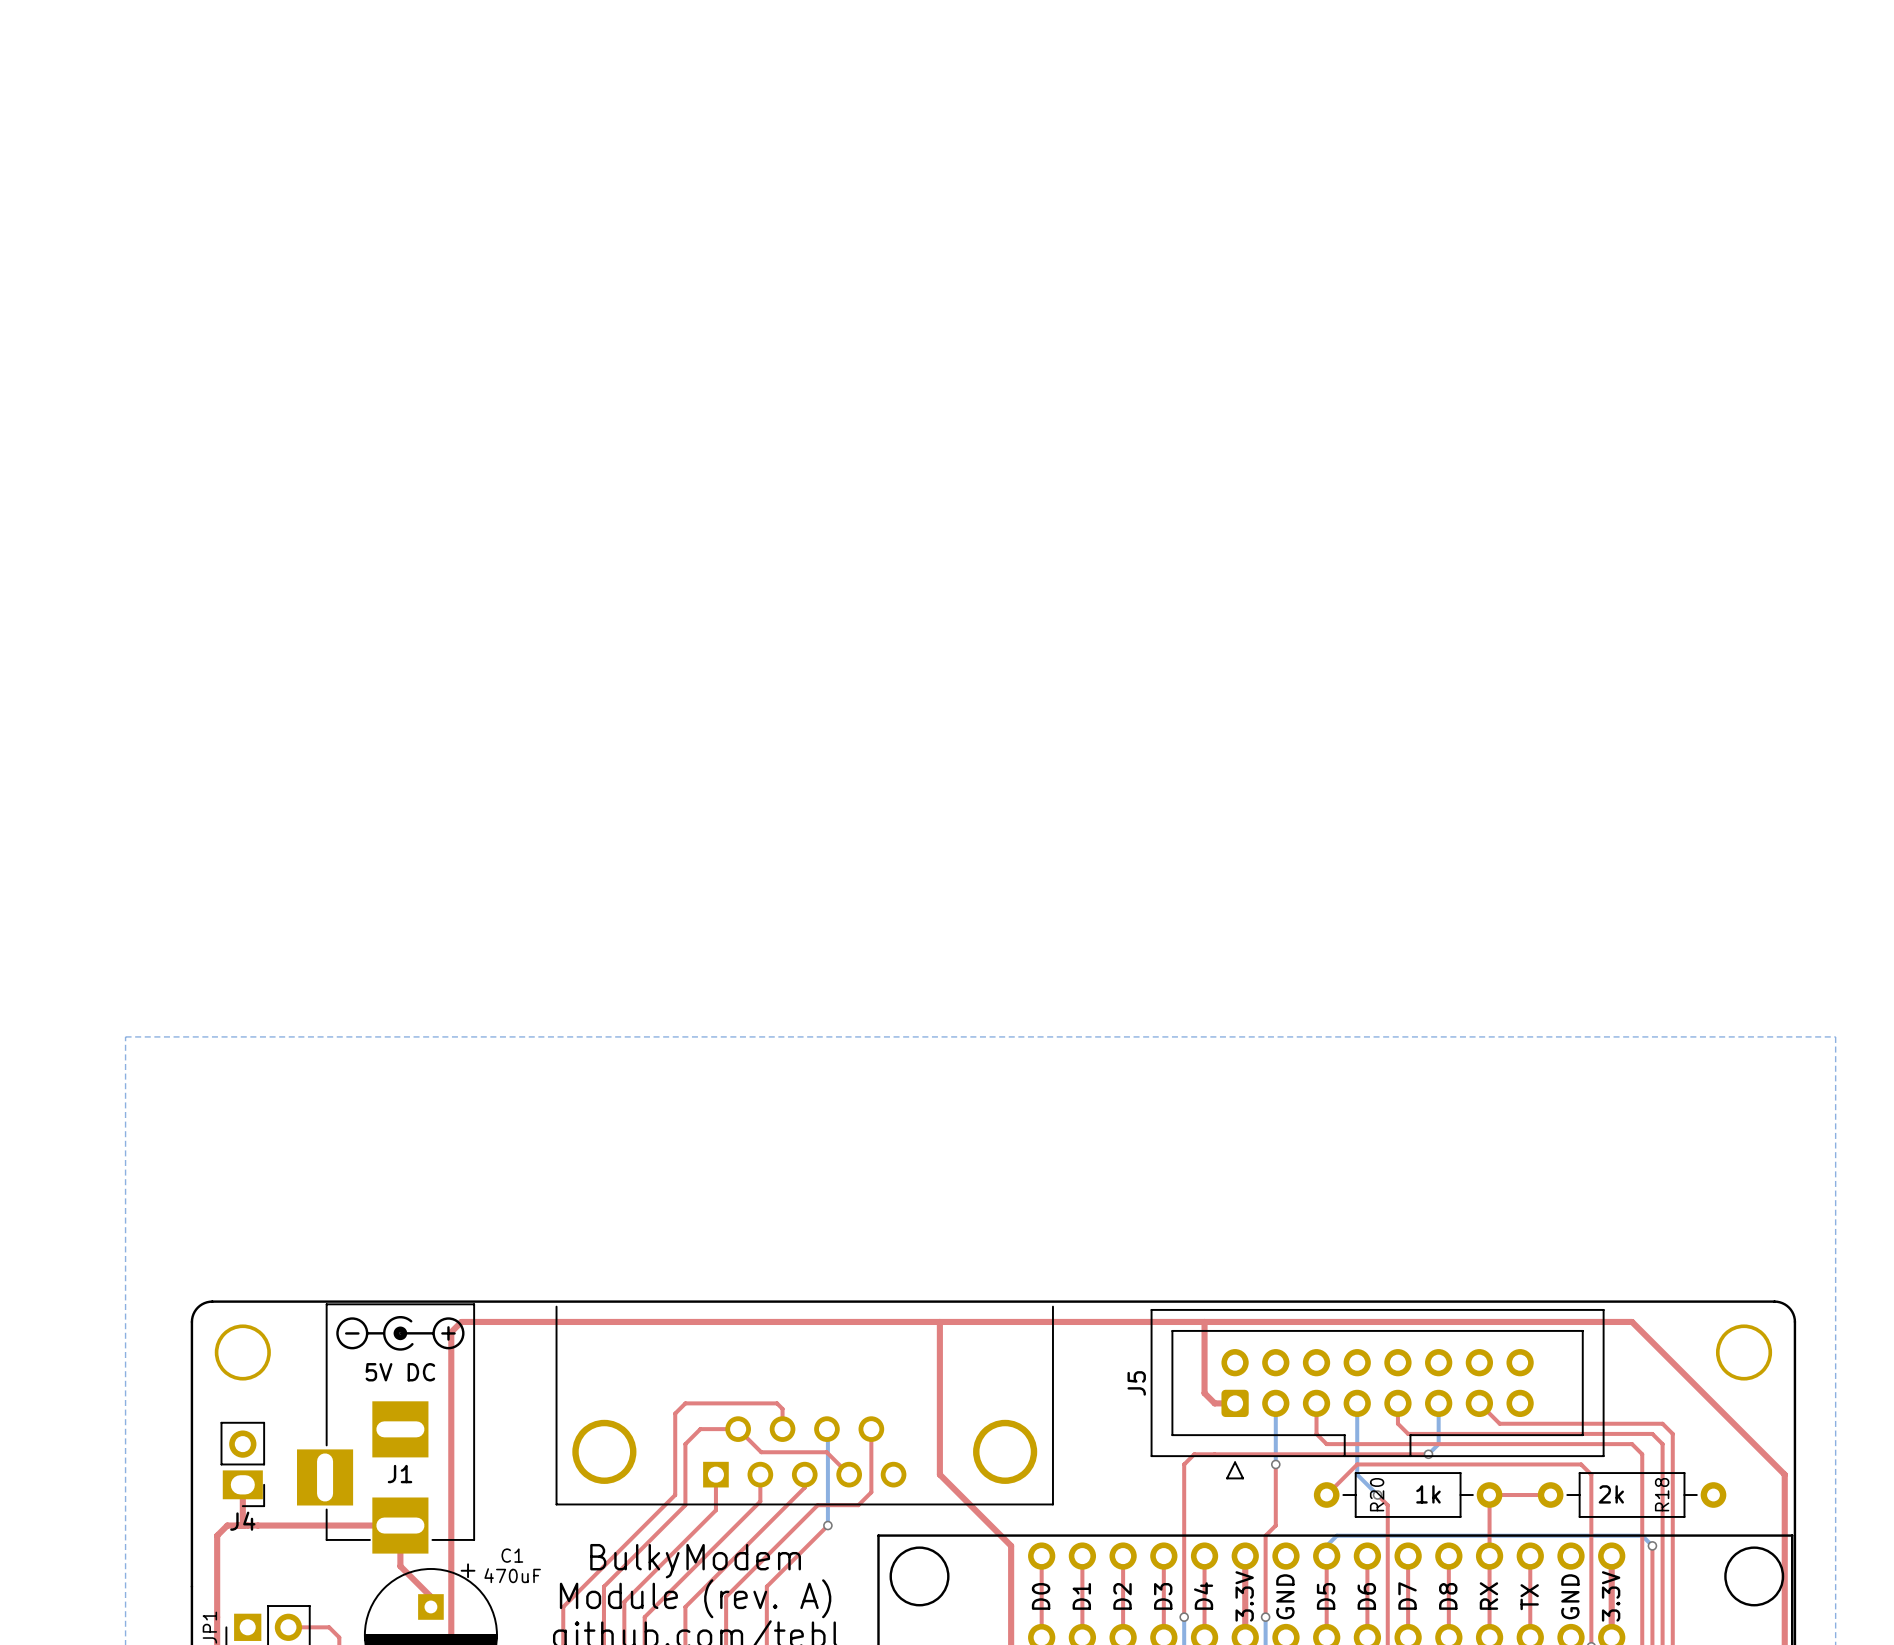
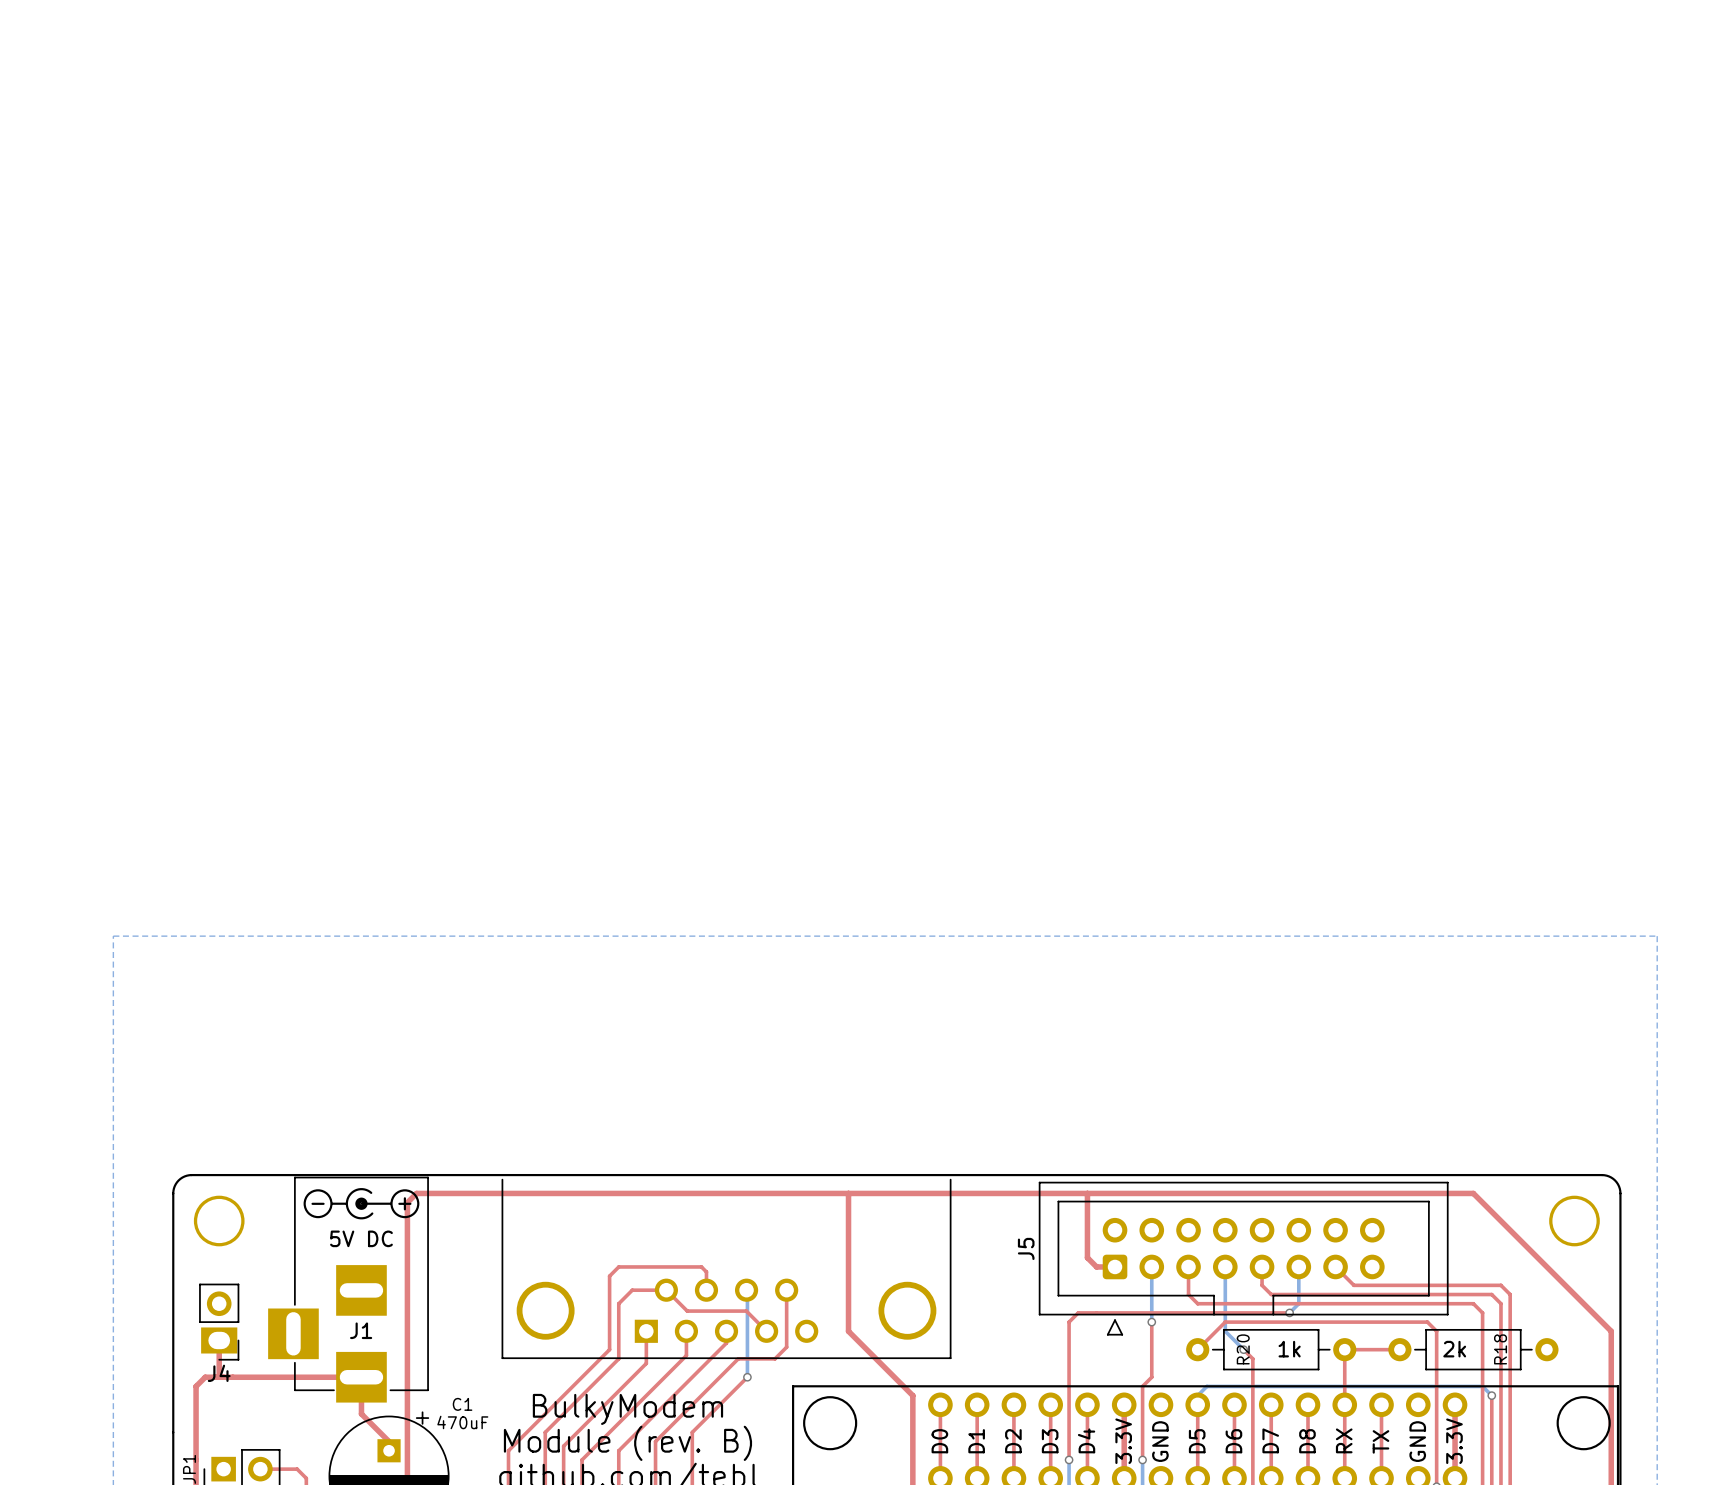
text: Module (rev. A) (695, 1598) -> Module (rev. B) (627, 1443)

